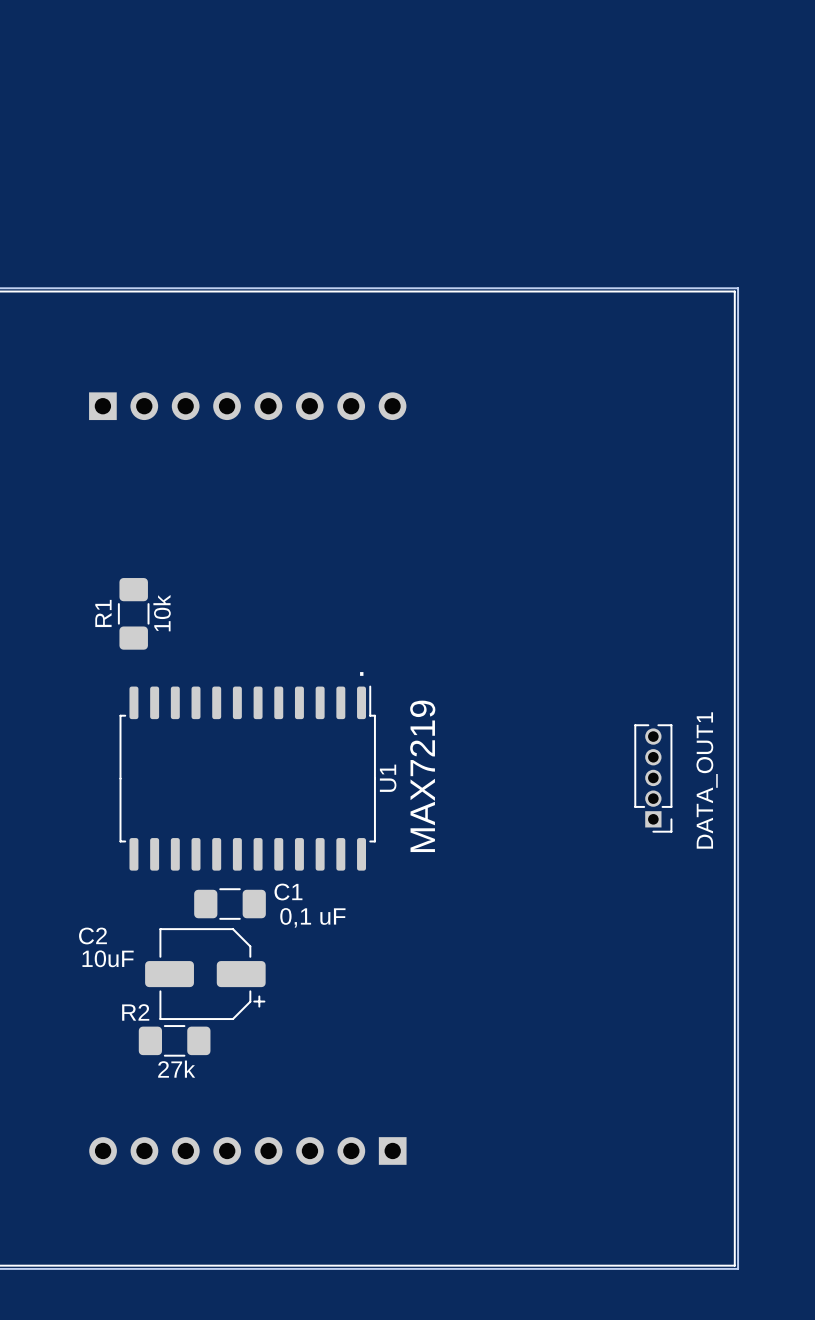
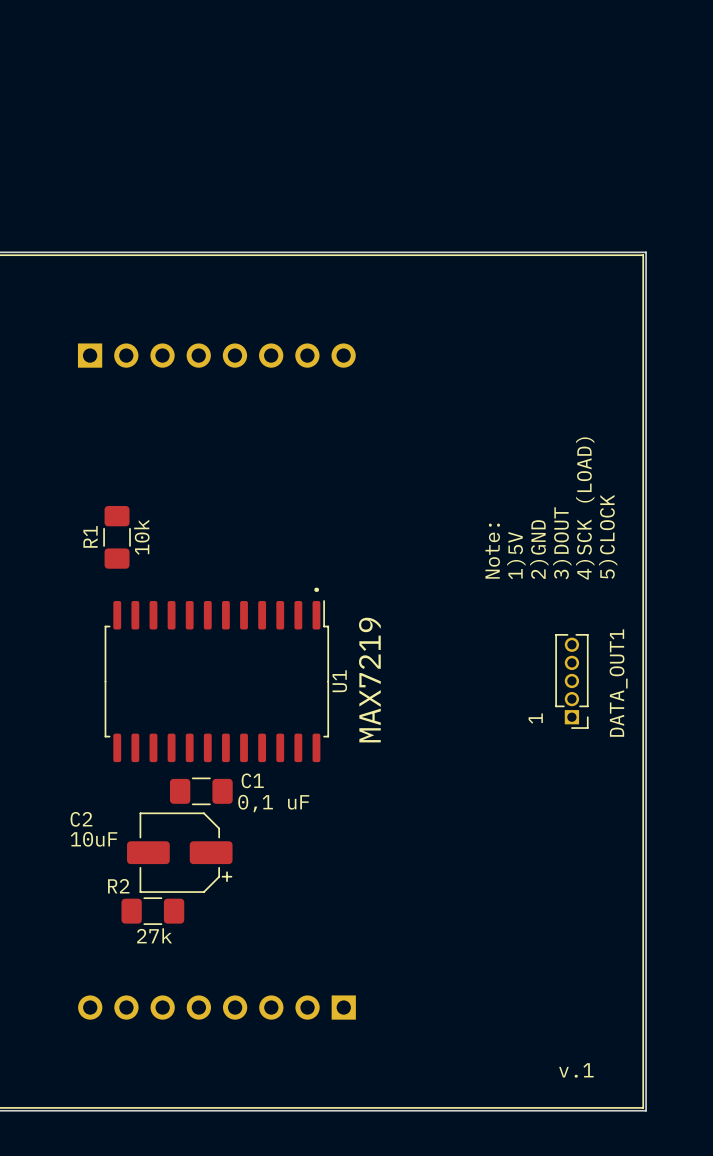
text: none -> 4)SCK (LOAD) (585, 508)
text: none -> 5)CLOCK (608, 536)
text: none -> 3)DOUT (562, 543)
text: none -> 2)GND (539, 549)
text: none -> Note: (492, 551)
text: none -> 1)5V (516, 555)
text: none -> 1 (535, 718)
text: none -> v.1 (576, 1070)

